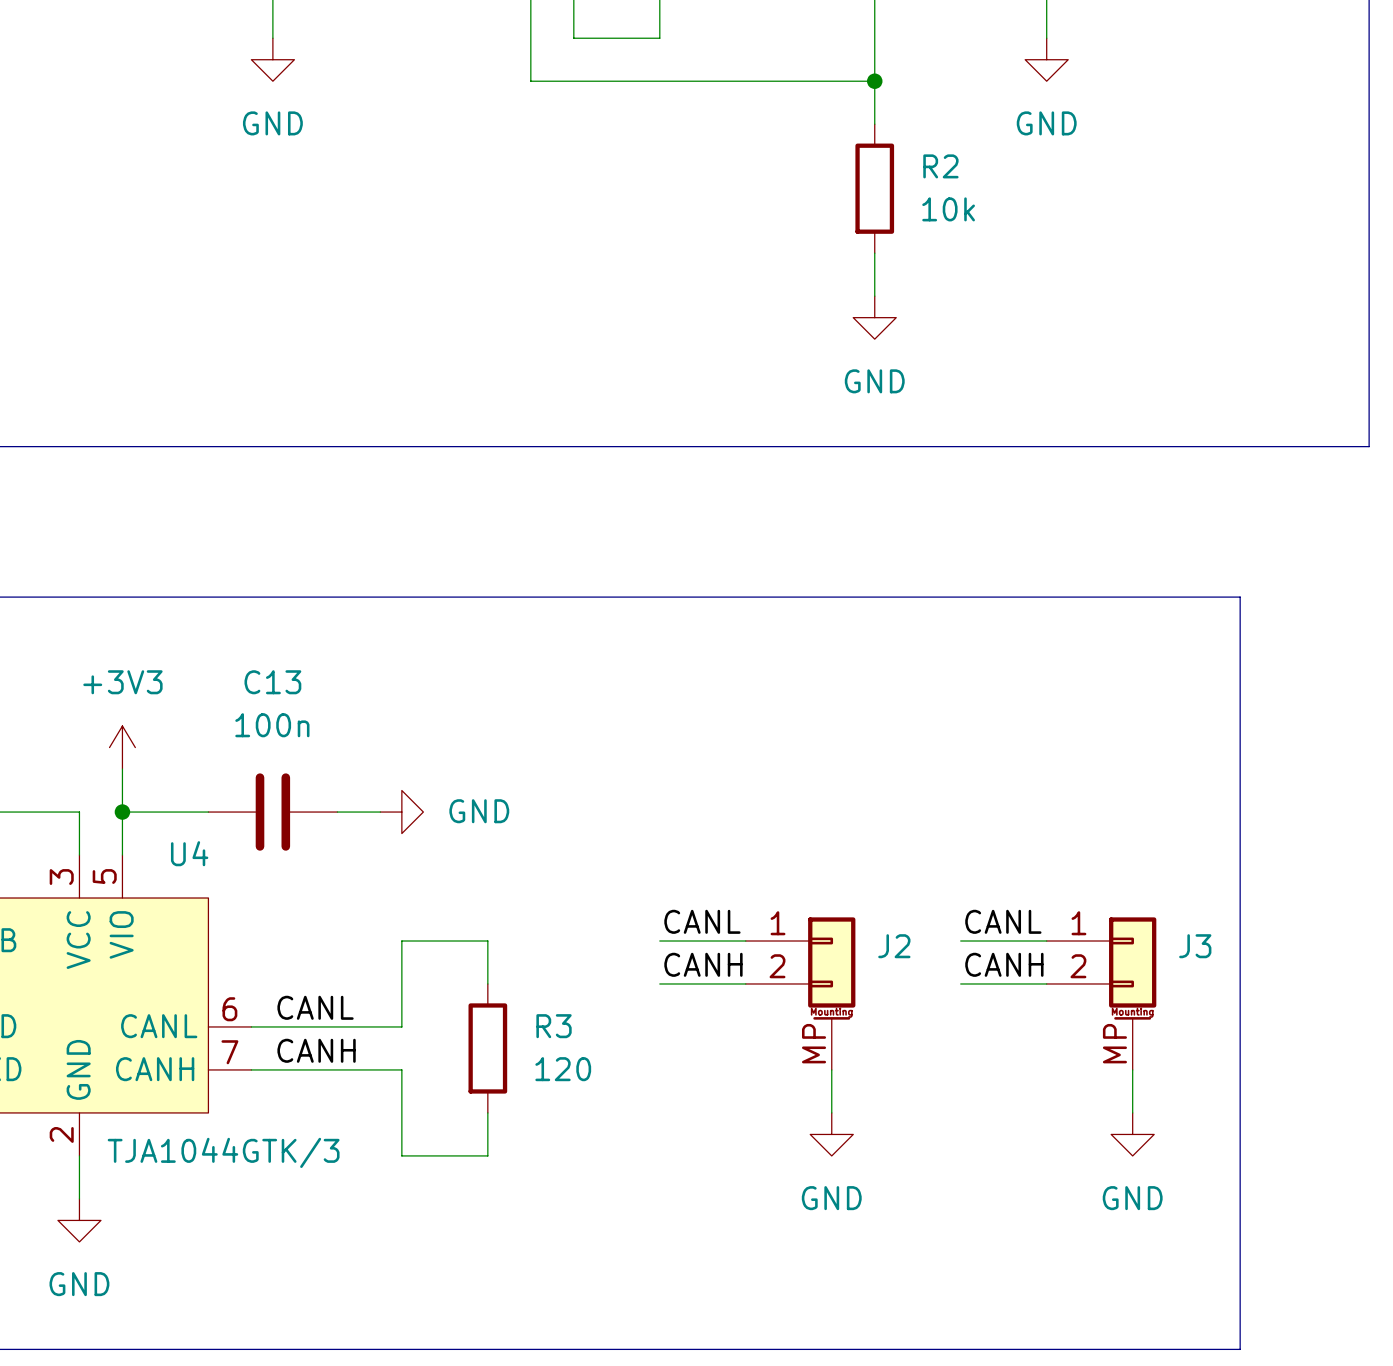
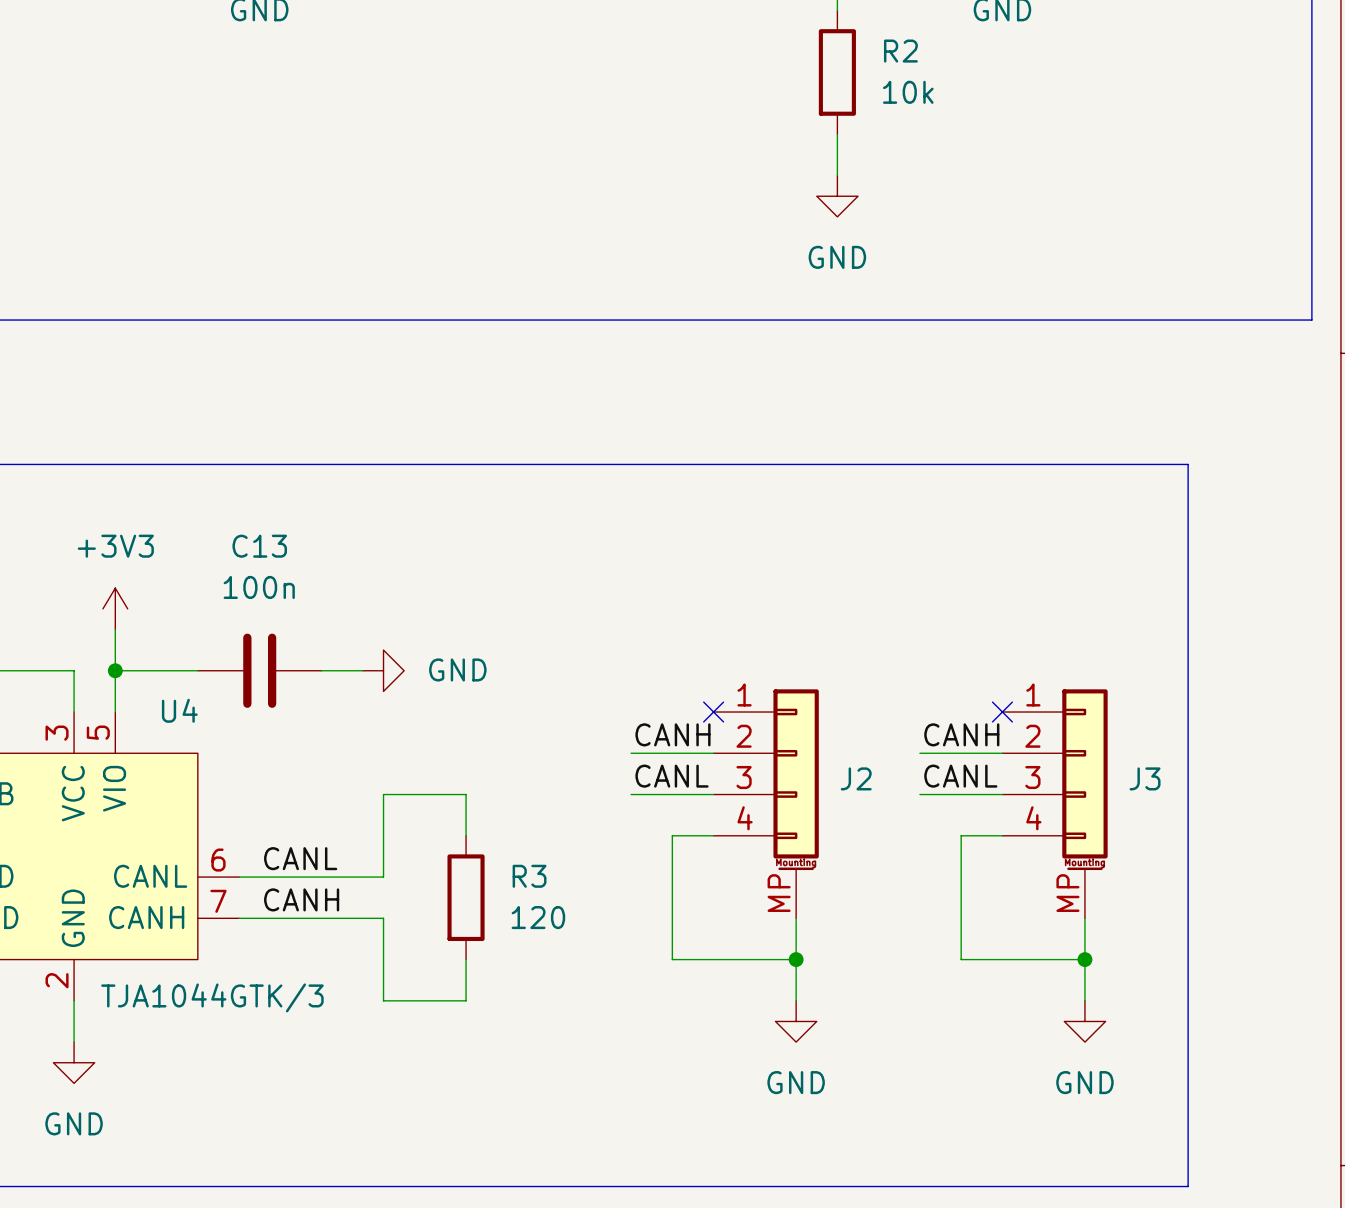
no-connect mark: none -> (713, 712)
no-connect mark: none -> (1002, 712)
wire: none -> (631, 753) (713, 753)
wire: none -> (919, 753) (1002, 753)
J2 symbol: [745, 917, 856, 1070] -> [713, 689, 819, 919]
J3 symbol: [1046, 917, 1157, 1070] -> [1002, 689, 1108, 919]
label position: CANH (703, 964) -> CANH (672, 734)
label position: CANH (1004, 964) -> CANH (961, 734)
wire: (659, 983) (702, 983) -> (796, 1000) (796, 959) (672, 959) (672, 835)
wire: (960, 983) (1003, 983) -> (1084, 1000) (1084, 959) (961, 959) (961, 835)
junction: none -> (796, 959)
junction: none -> (1084, 959)
power symbol position: GND (831, 1134) -> GND (796, 1021)
power symbol position: GND (1132, 1134) -> GND (1084, 1021)

